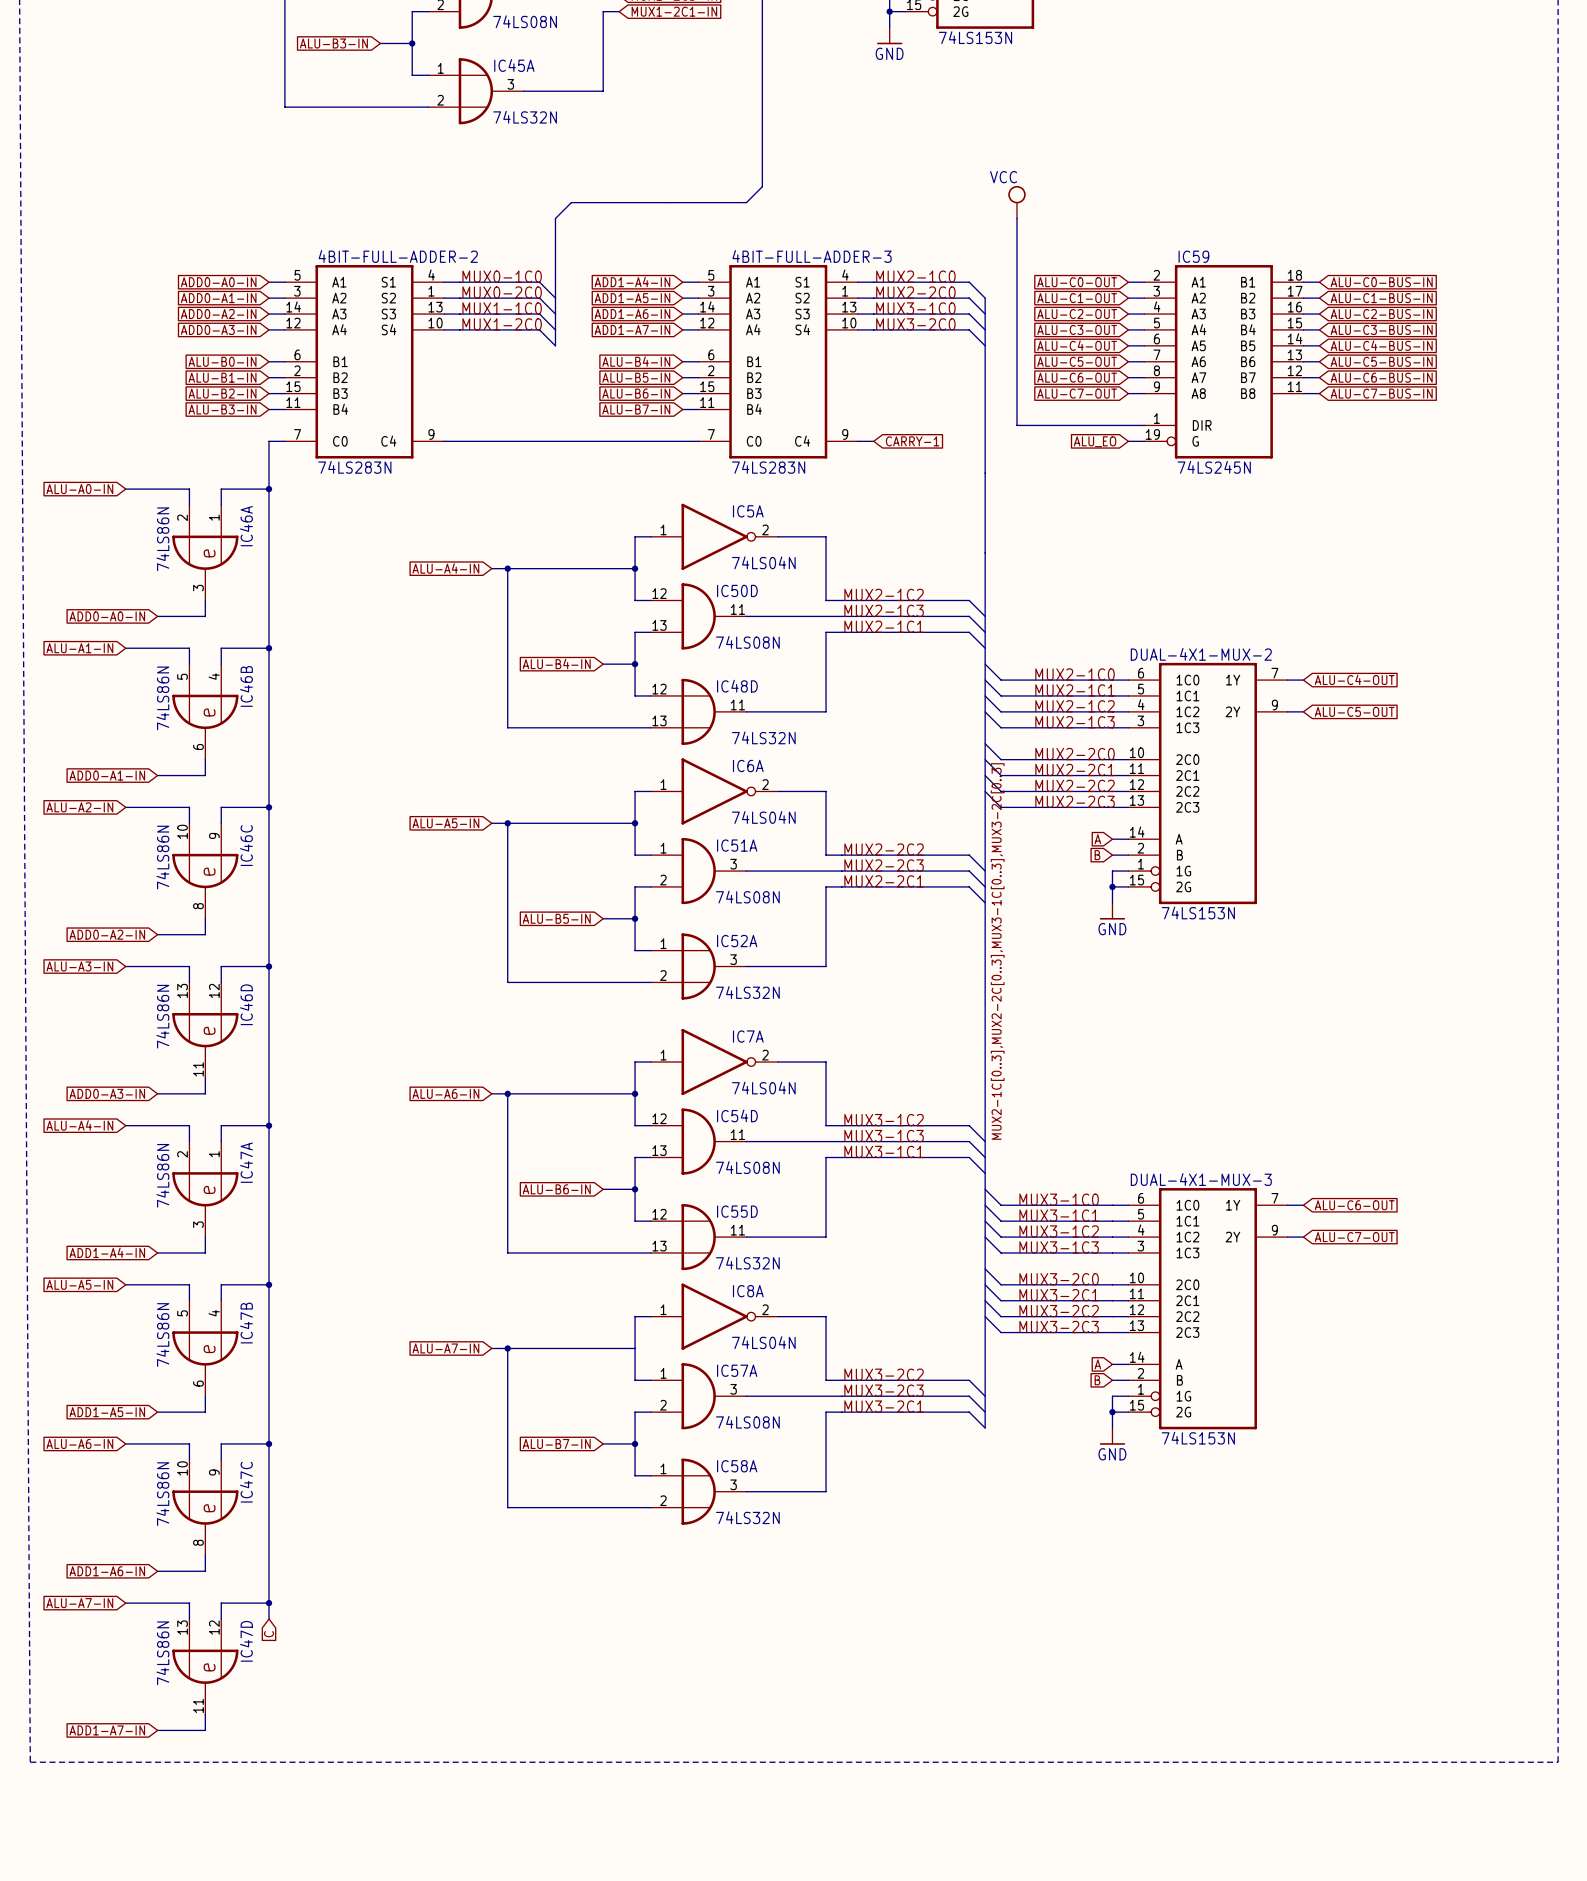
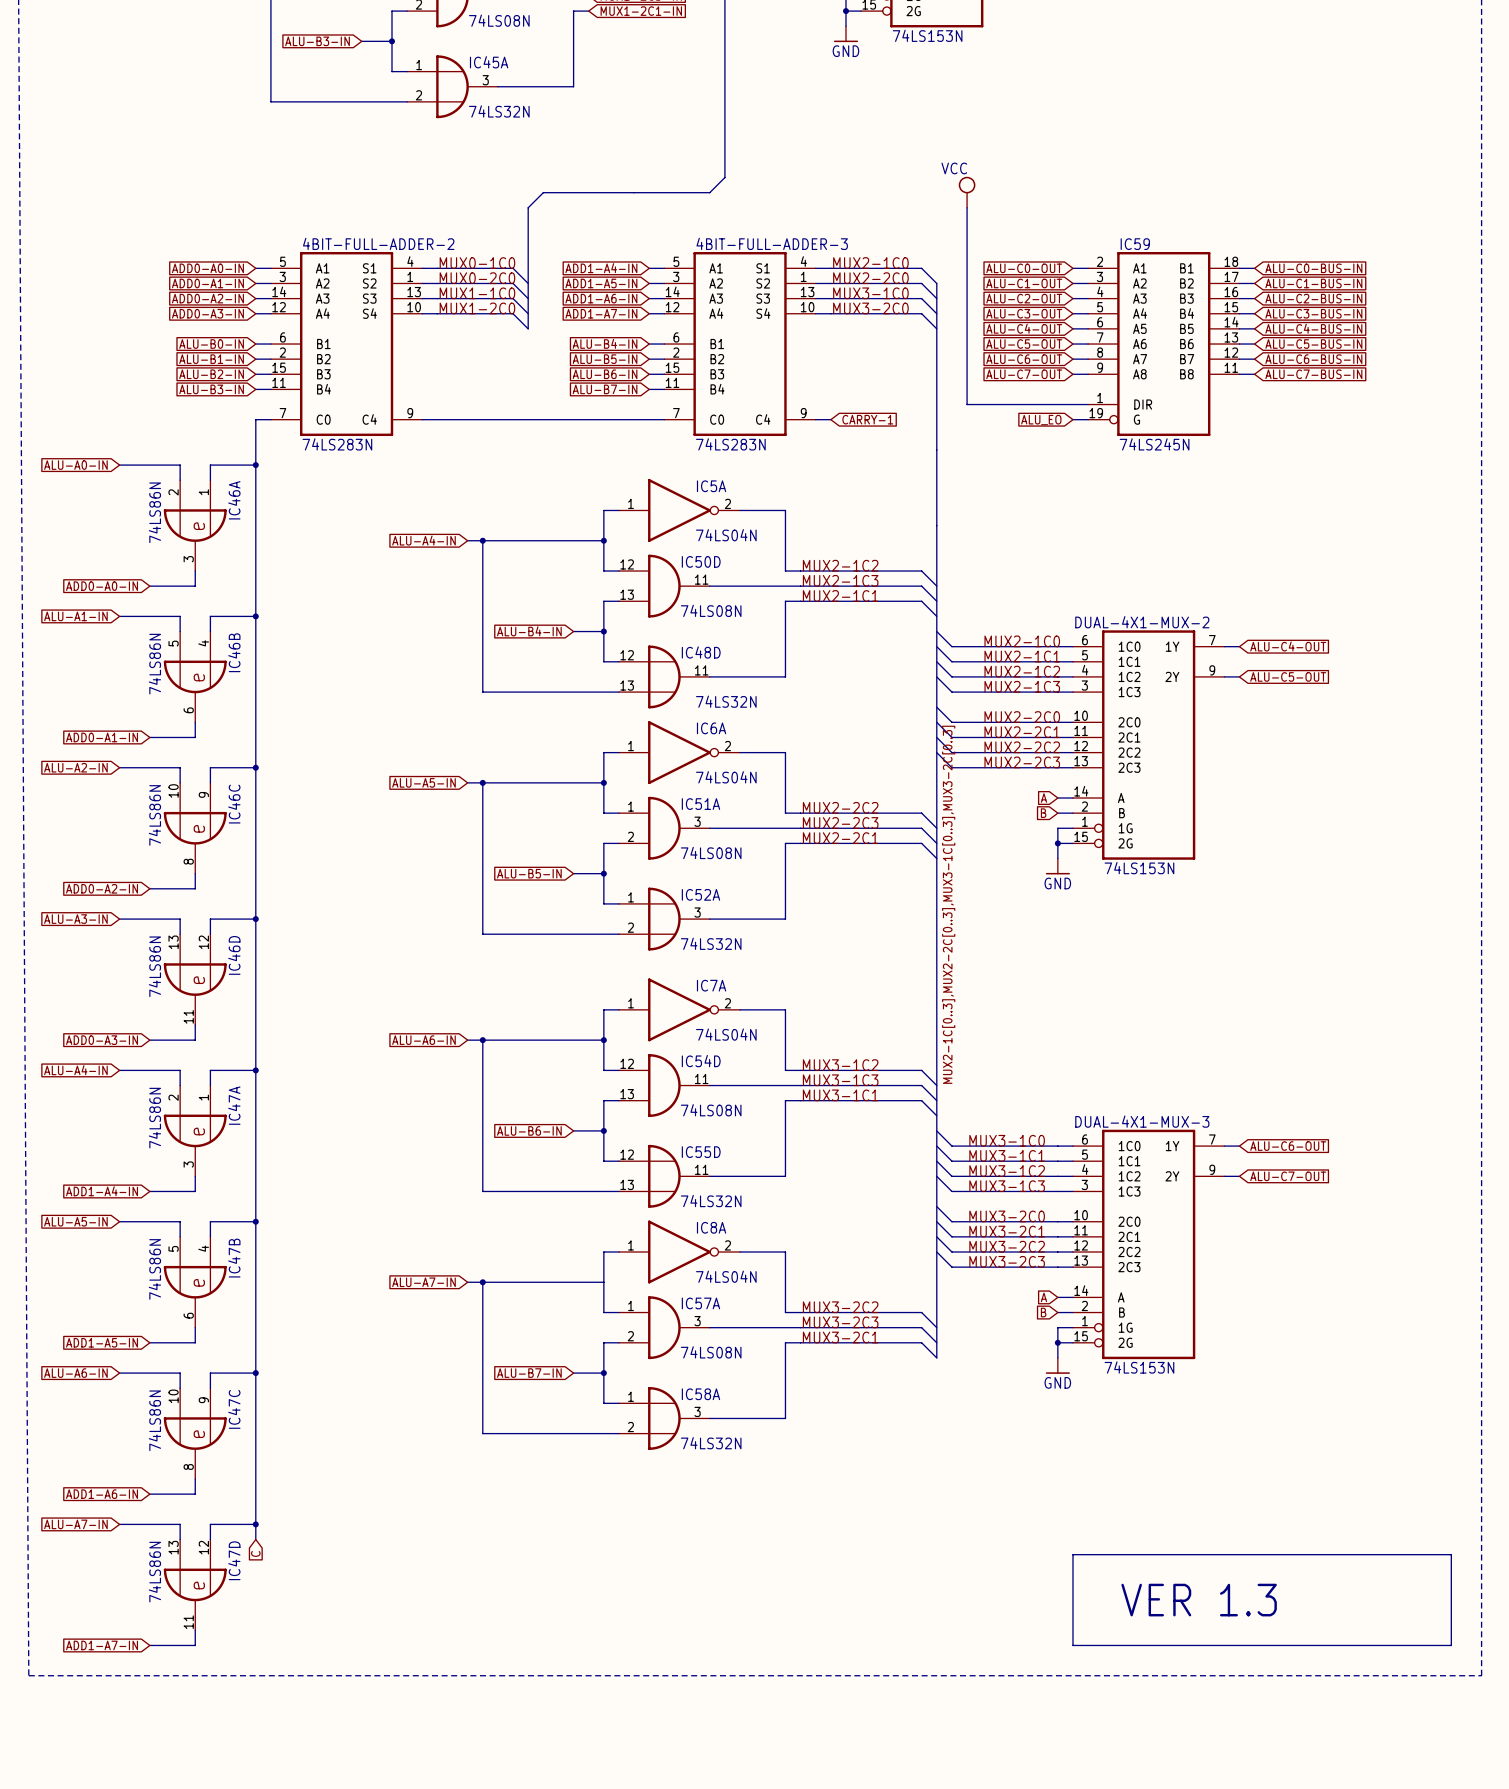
line: none -> (1072, 1554) (1072, 1645) (1451, 1645) (1451, 1554) (1072, 1554)
text: none -> VER 1.3 (1199, 1600)

